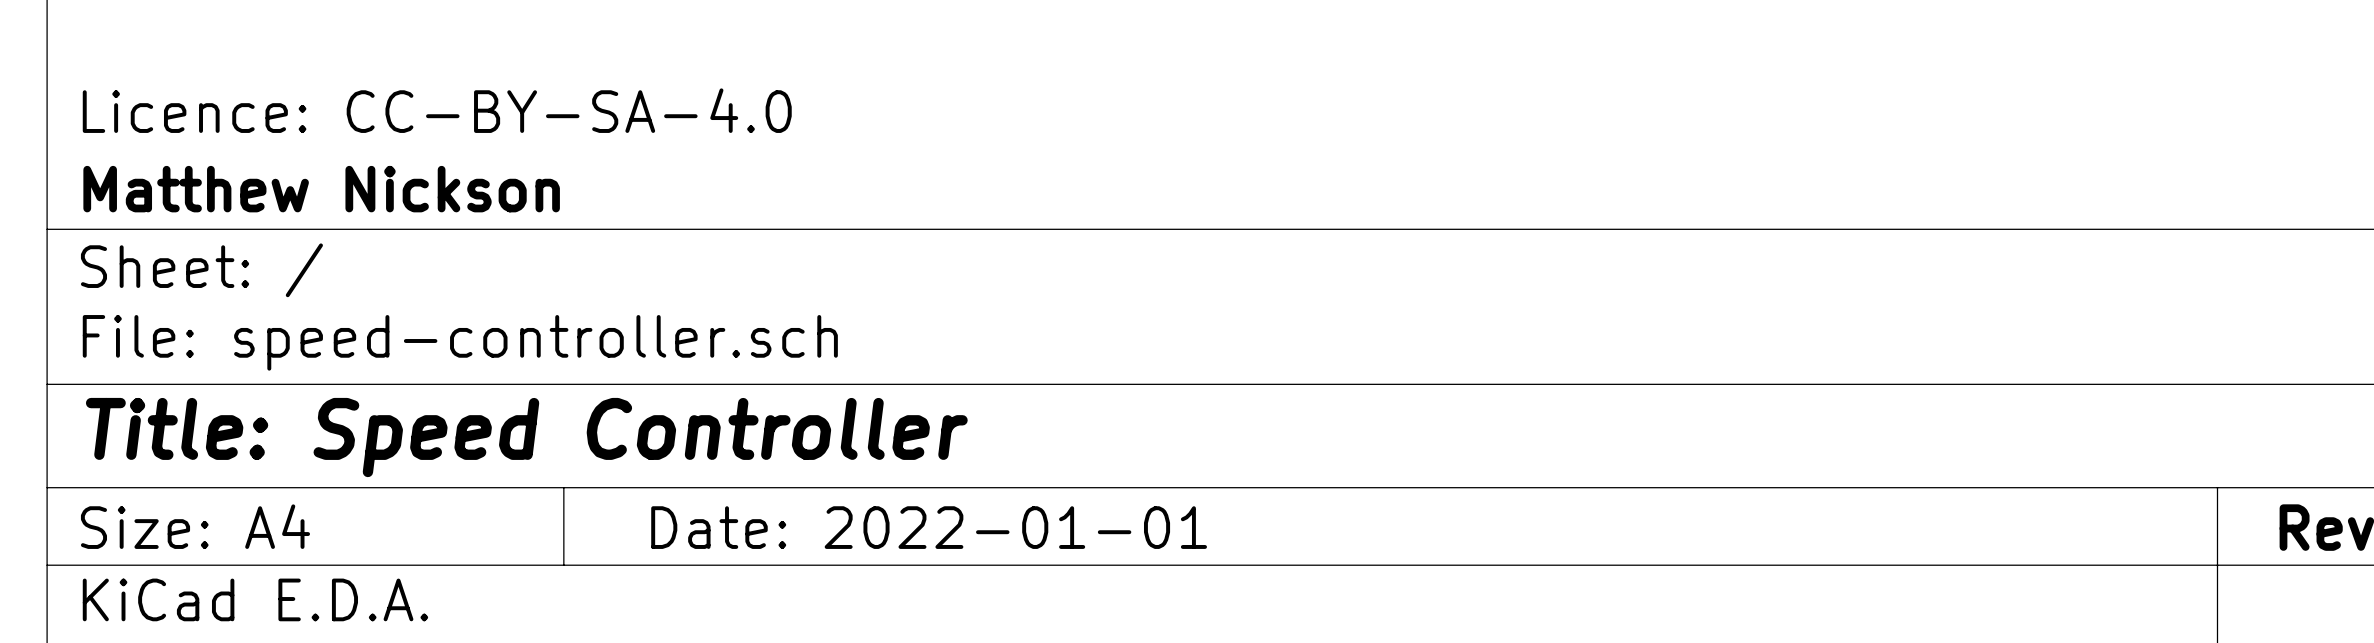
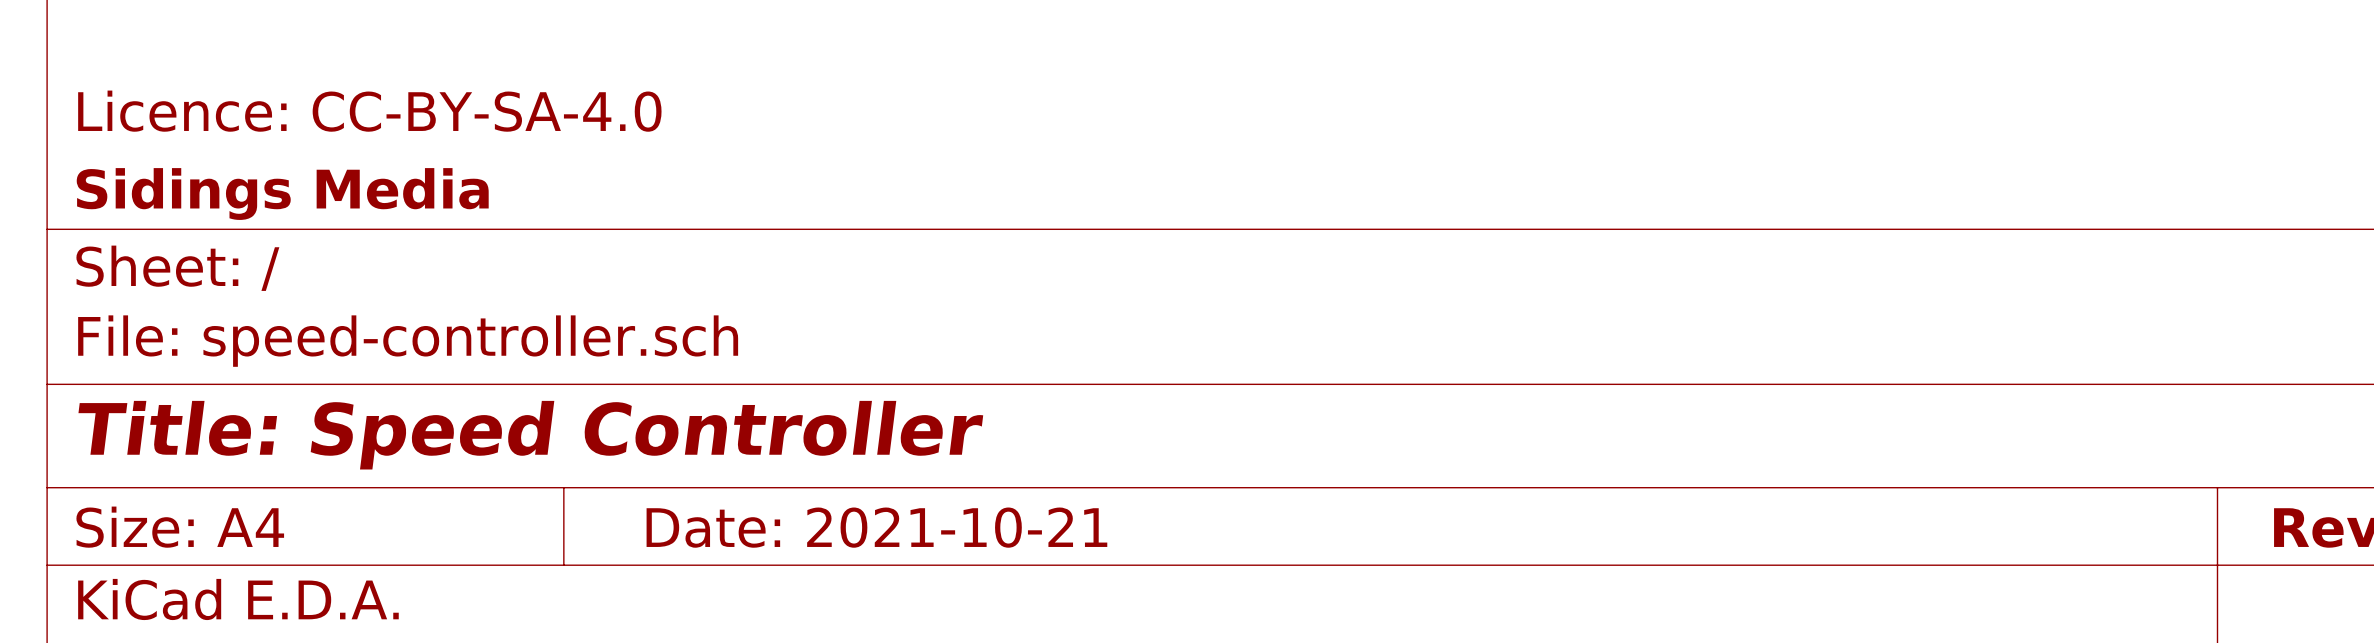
title block: Matthew Nickson (321, 189) -> Sidings Media (282, 194)
title block: Date: 2022-01-01 (929, 527) -> Date: 2021-10-21 (876, 527)

